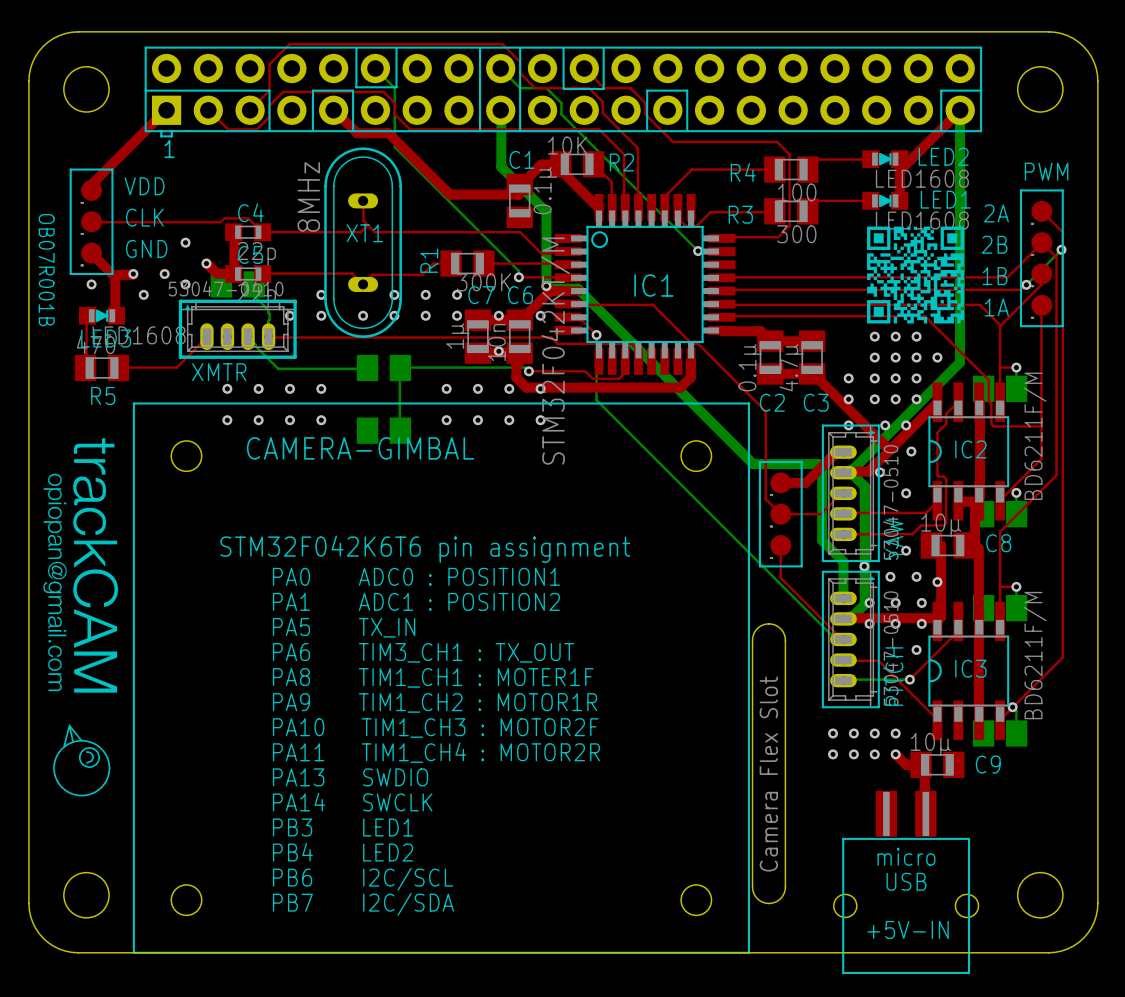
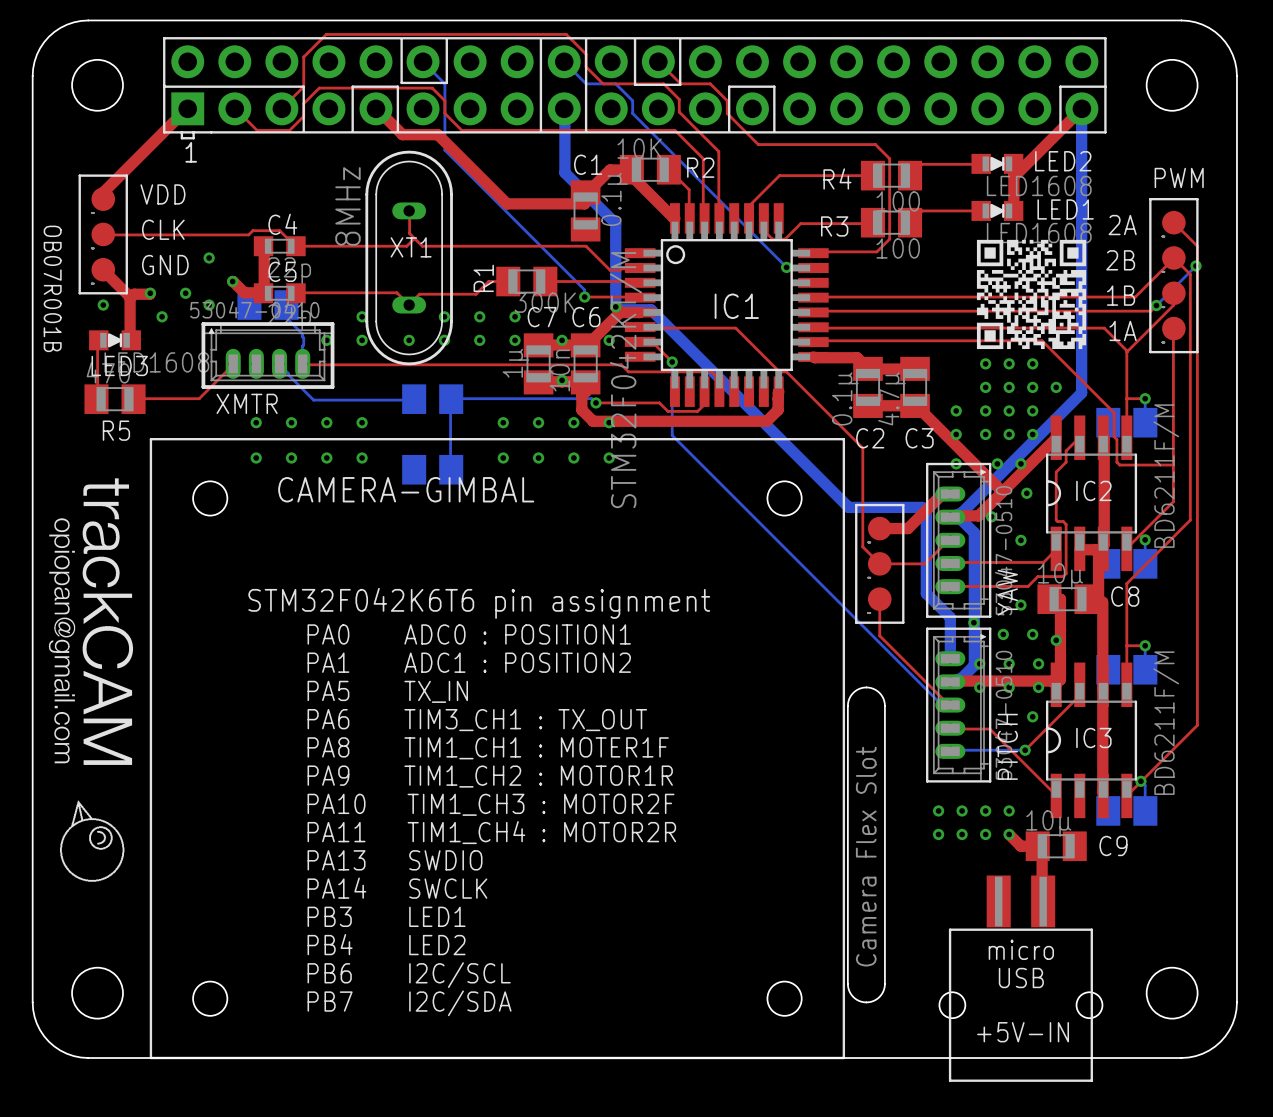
R3 value: 300 (796, 234) -> 100 (898, 248)

